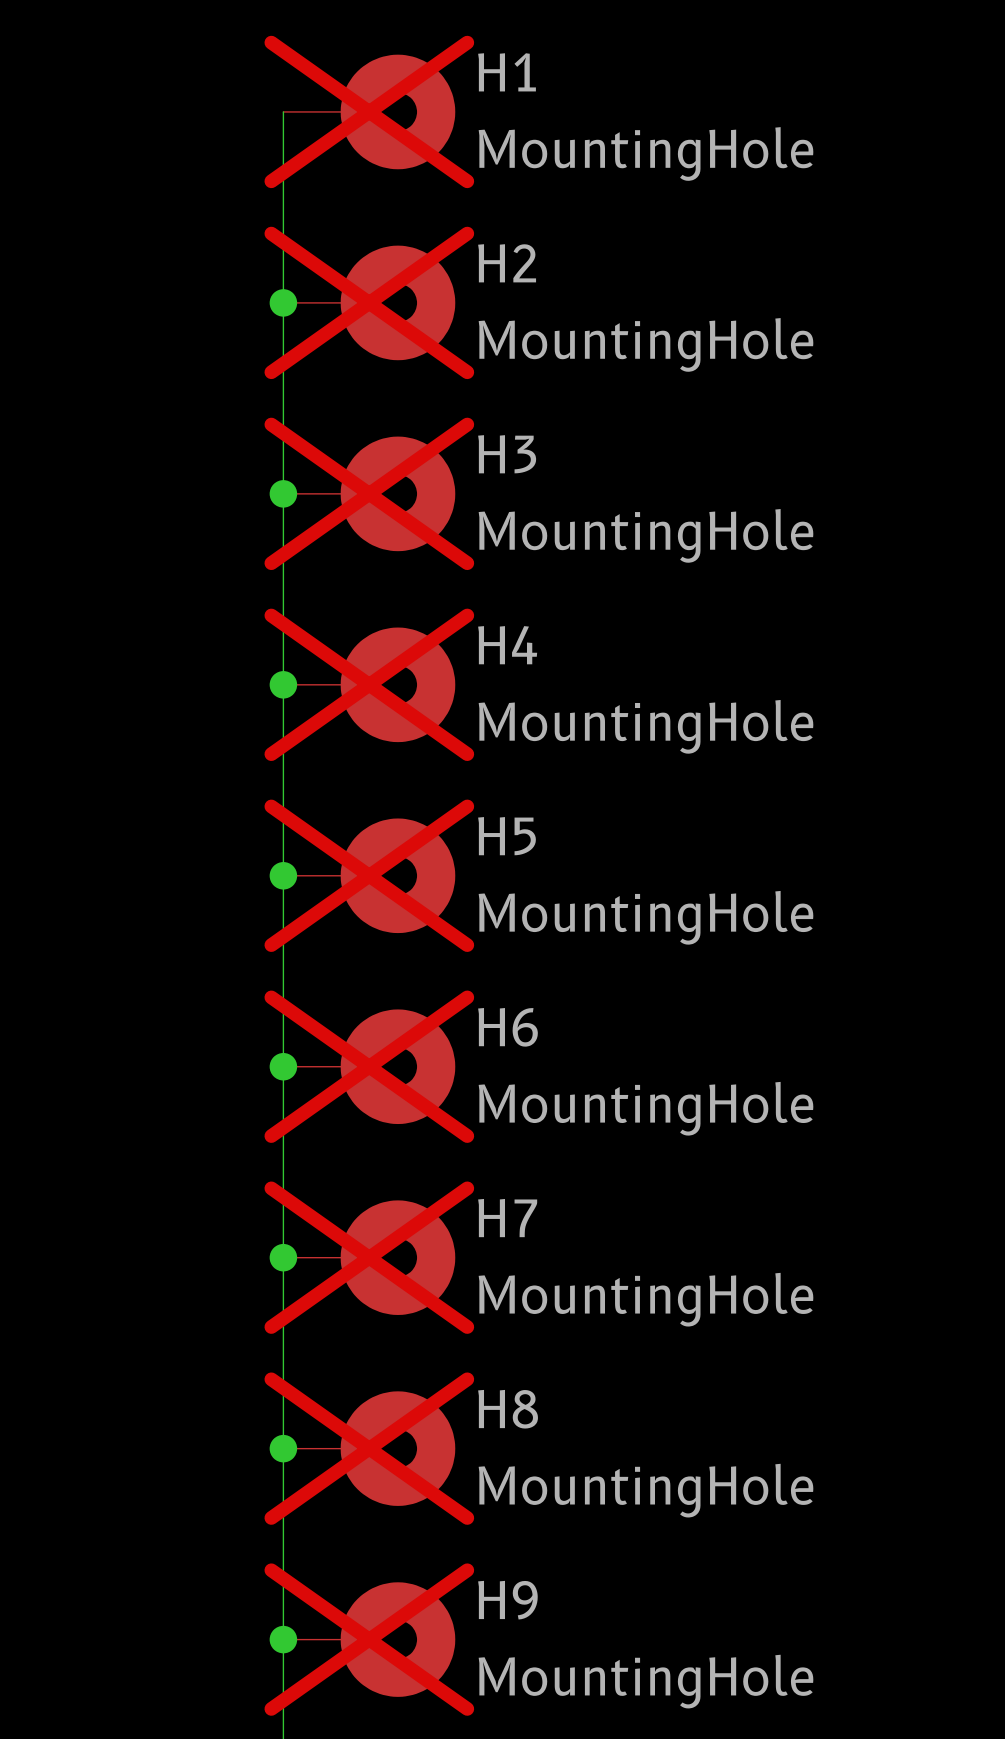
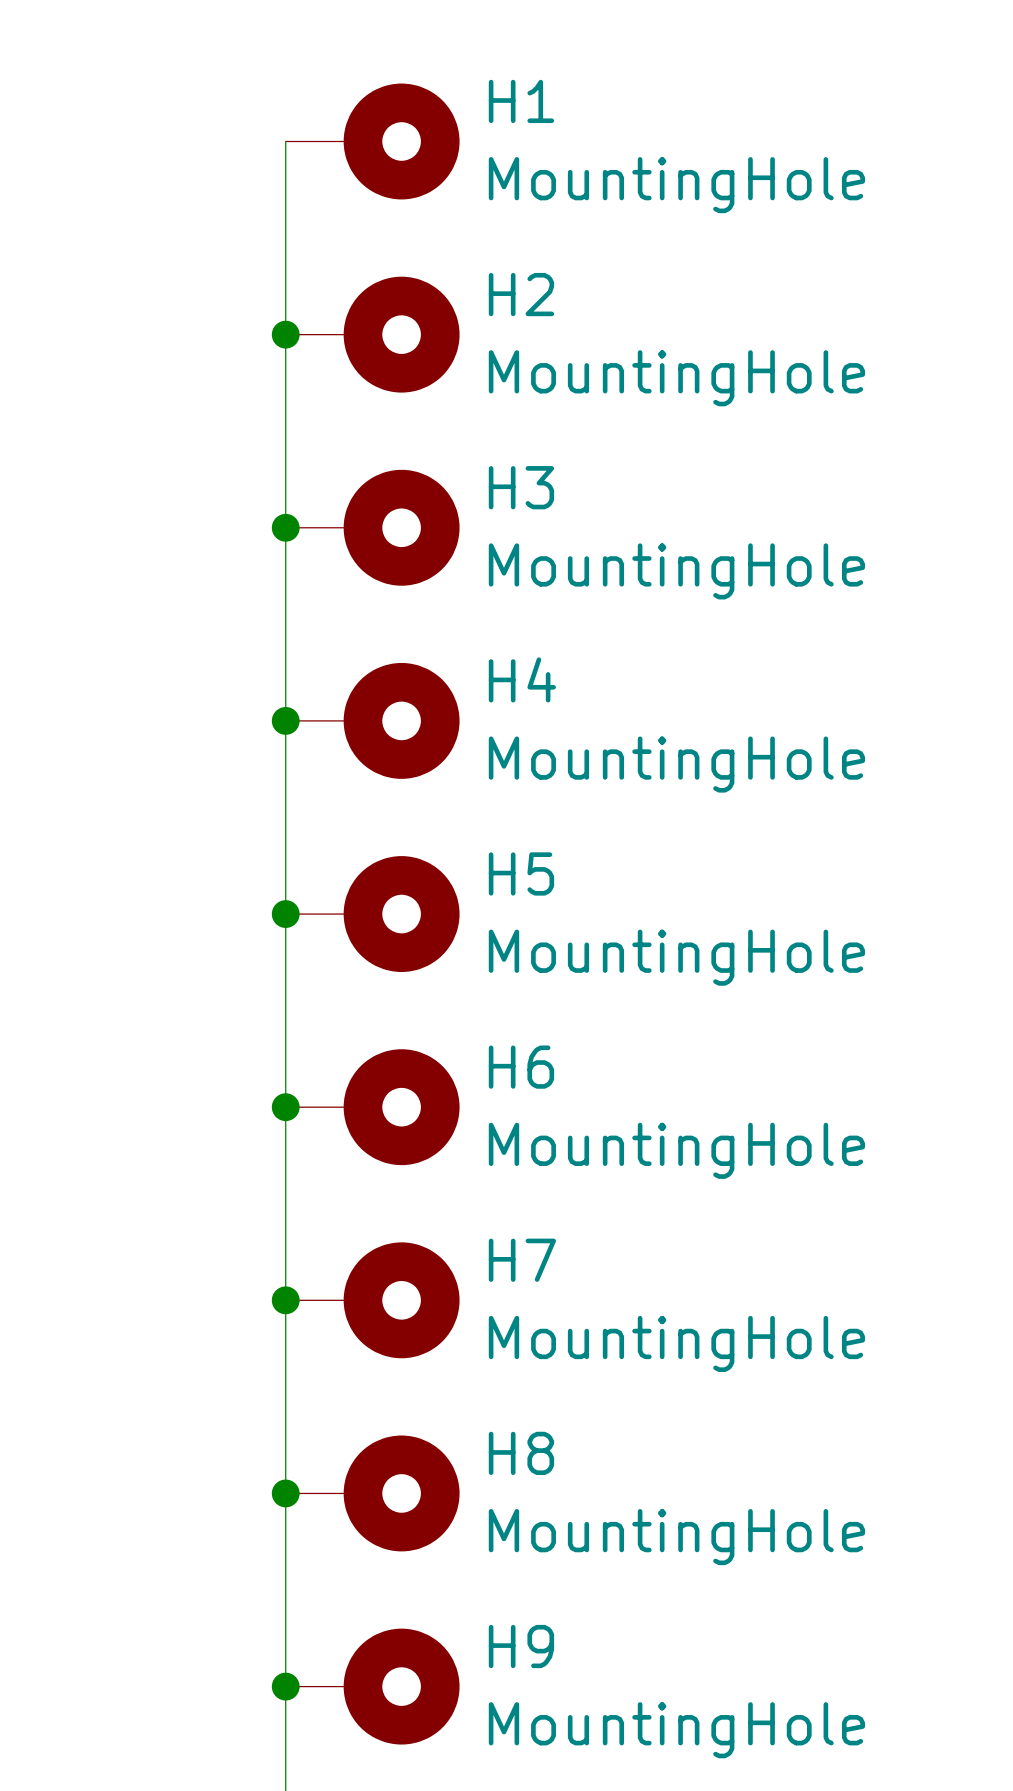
H1 do-not-place cross: (369, 111) -> none
H2 do-not-place cross: (369, 302) -> none
H3 do-not-place cross: (369, 493) -> none
H4 do-not-place cross: (369, 684) -> none
H5 do-not-place cross: (369, 875) -> none
H6 do-not-place cross: (369, 1066) -> none
H7 do-not-place cross: (369, 1257) -> none
H8 do-not-place cross: (369, 1448) -> none
H9 do-not-place cross: (369, 1639) -> none

